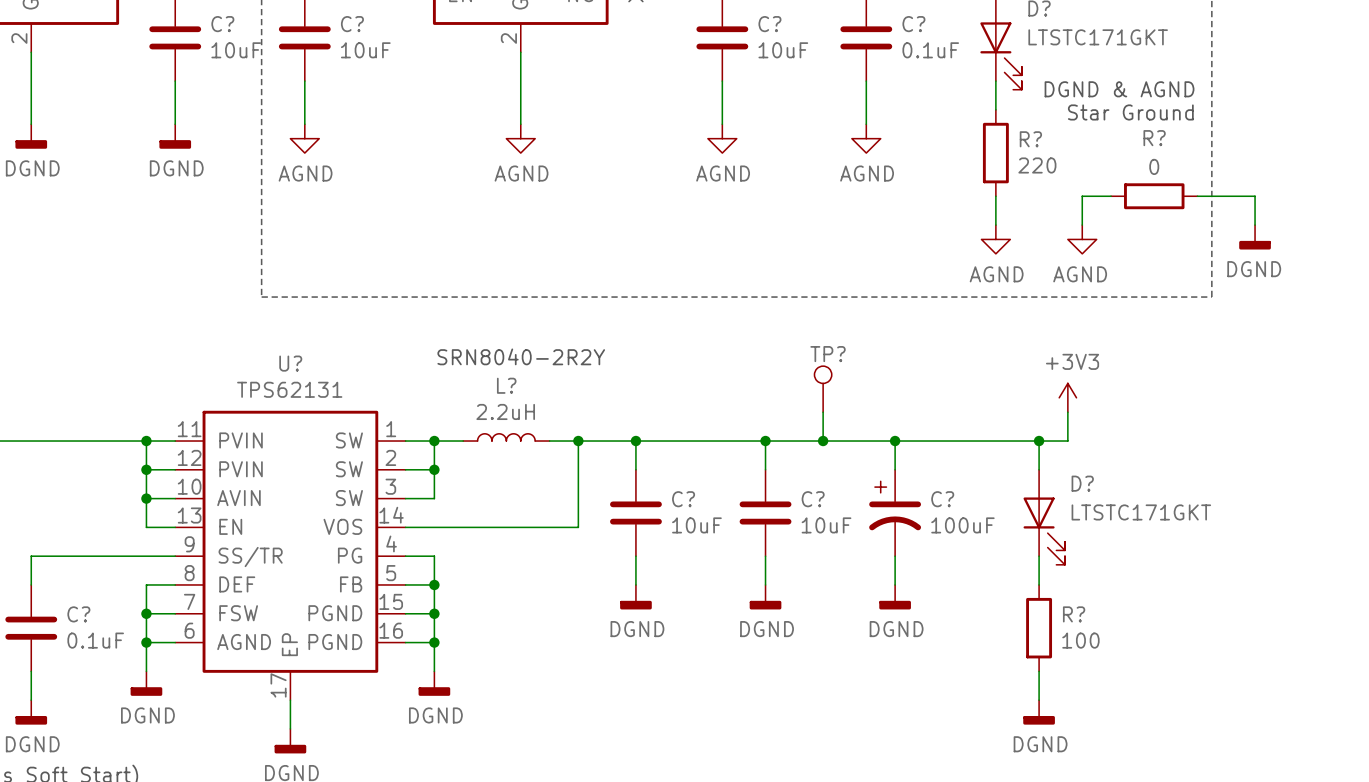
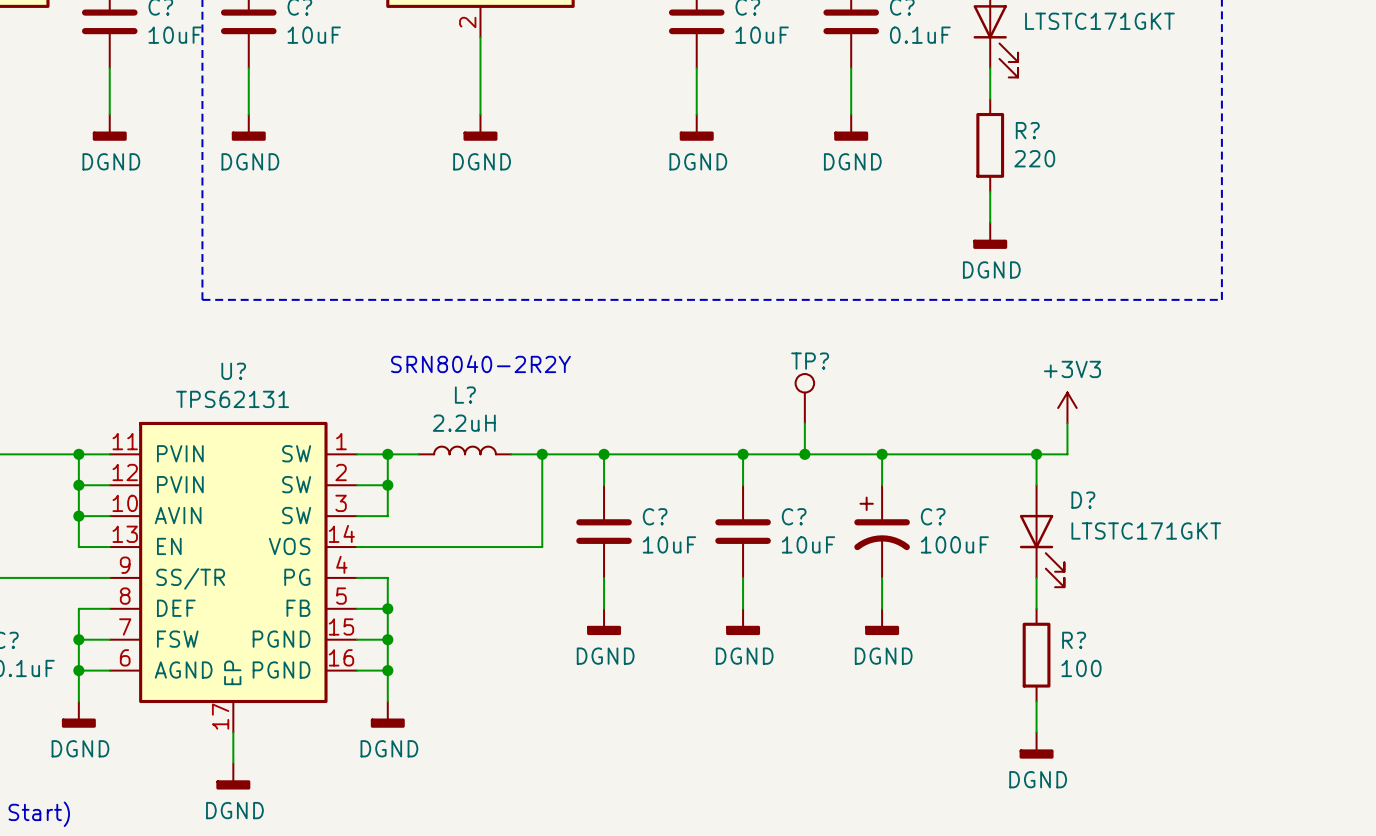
text: DGND & AGND (1119, 89) -> none
text: Star Ground (1130, 112) -> none
power symbol: AGND (304, 138) -> DGND (248, 127)
power symbol: AGND (520, 138) -> DGND (480, 127)
power symbol: AGND (722, 138) -> DGND (696, 127)
power symbol: AGND (866, 138) -> DGND (851, 127)
wire: (1111, 196) (1082, 196) (1082, 225) -> none
R?: 0 (1154, 196) -> none
wire: (1197, 196) (1255, 196) (1255, 225) -> none
power symbol: DGND (1255, 237) -> none
power symbol: AGND (995, 239) -> DGND (990, 235)
power symbol: AGND (1082, 239) -> none

